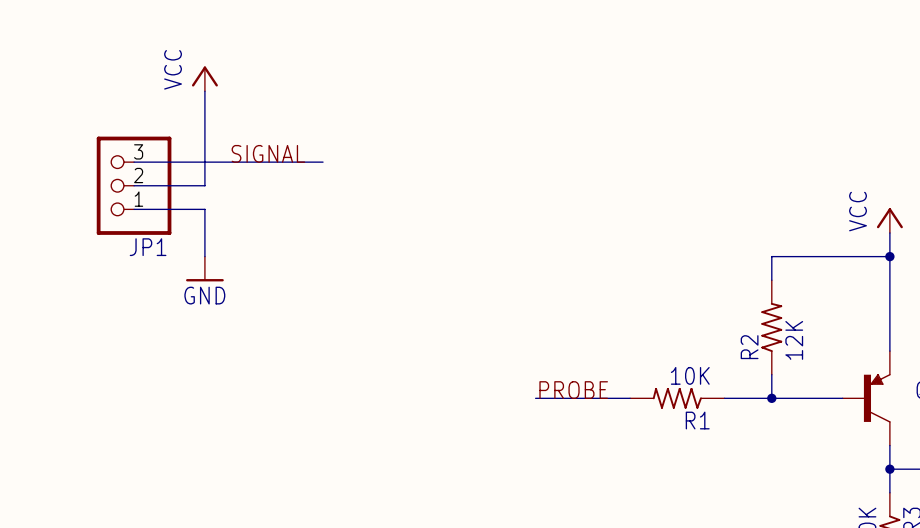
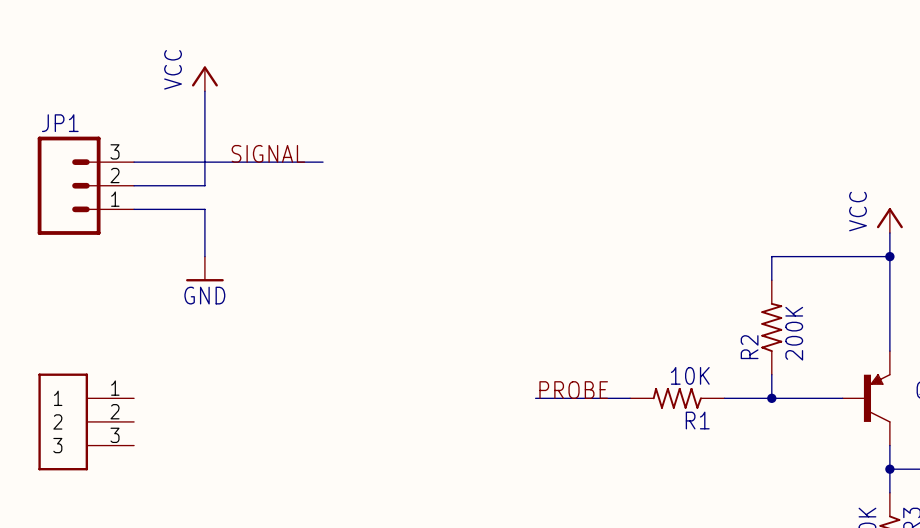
JP1 symbol: [96, 136, 172, 235] -> [37, 136, 135, 235]
JP1 name position: JP1 (148, 247) -> JP1 (60, 123)
R2 value: 12K (794, 340) -> 200K (794, 333)
part: none -> (86, 421)

